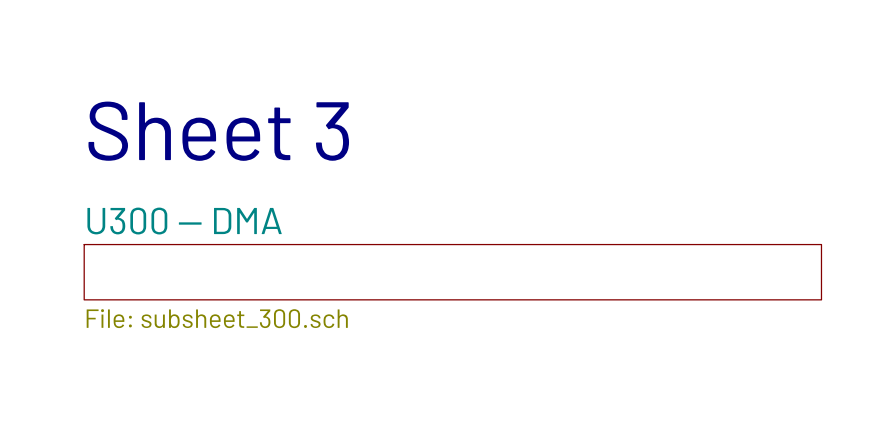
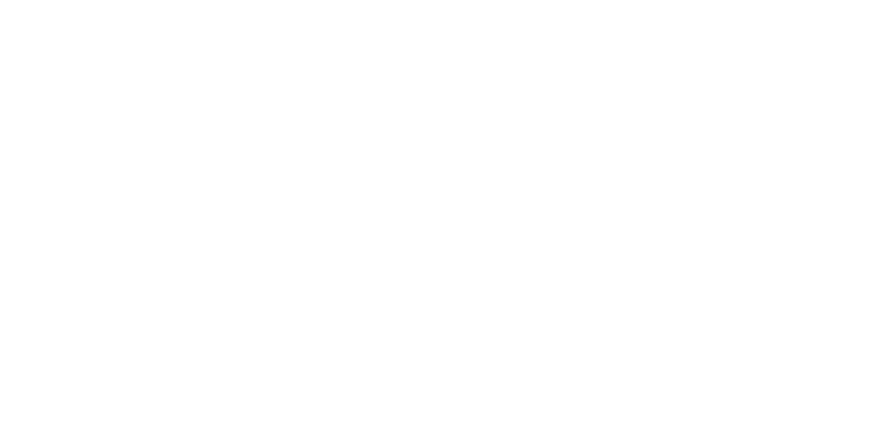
text: Sheet 3 (218, 131) -> none
sheet U300 — DMA: File: subsheet_300.sch (452, 272) -> none

